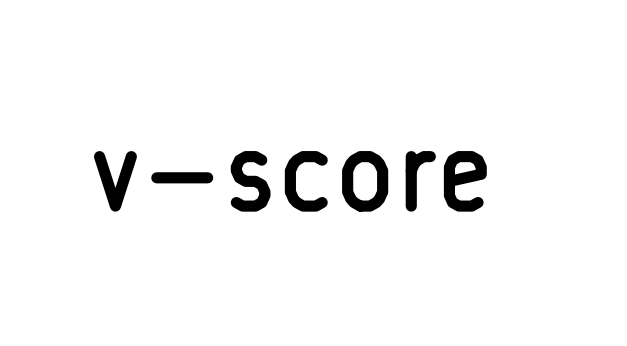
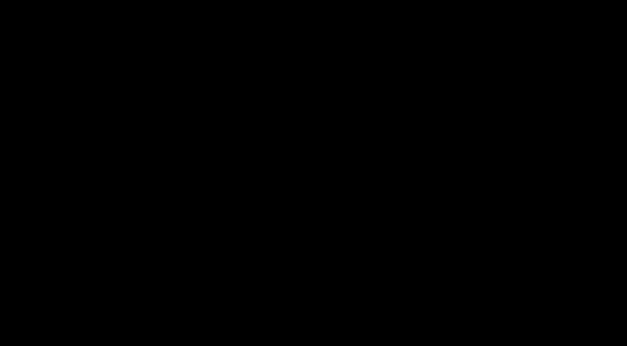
text: v-score (290, 181) -> none

